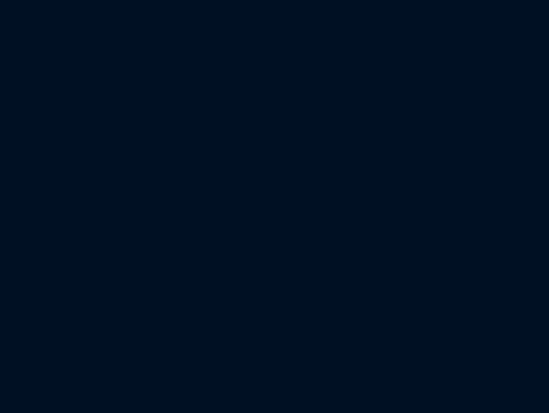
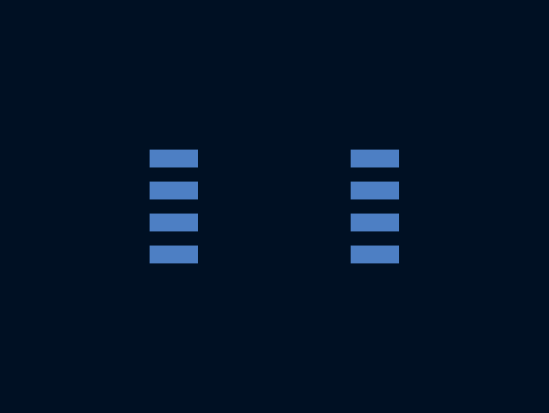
part: none -> (274, 206)

